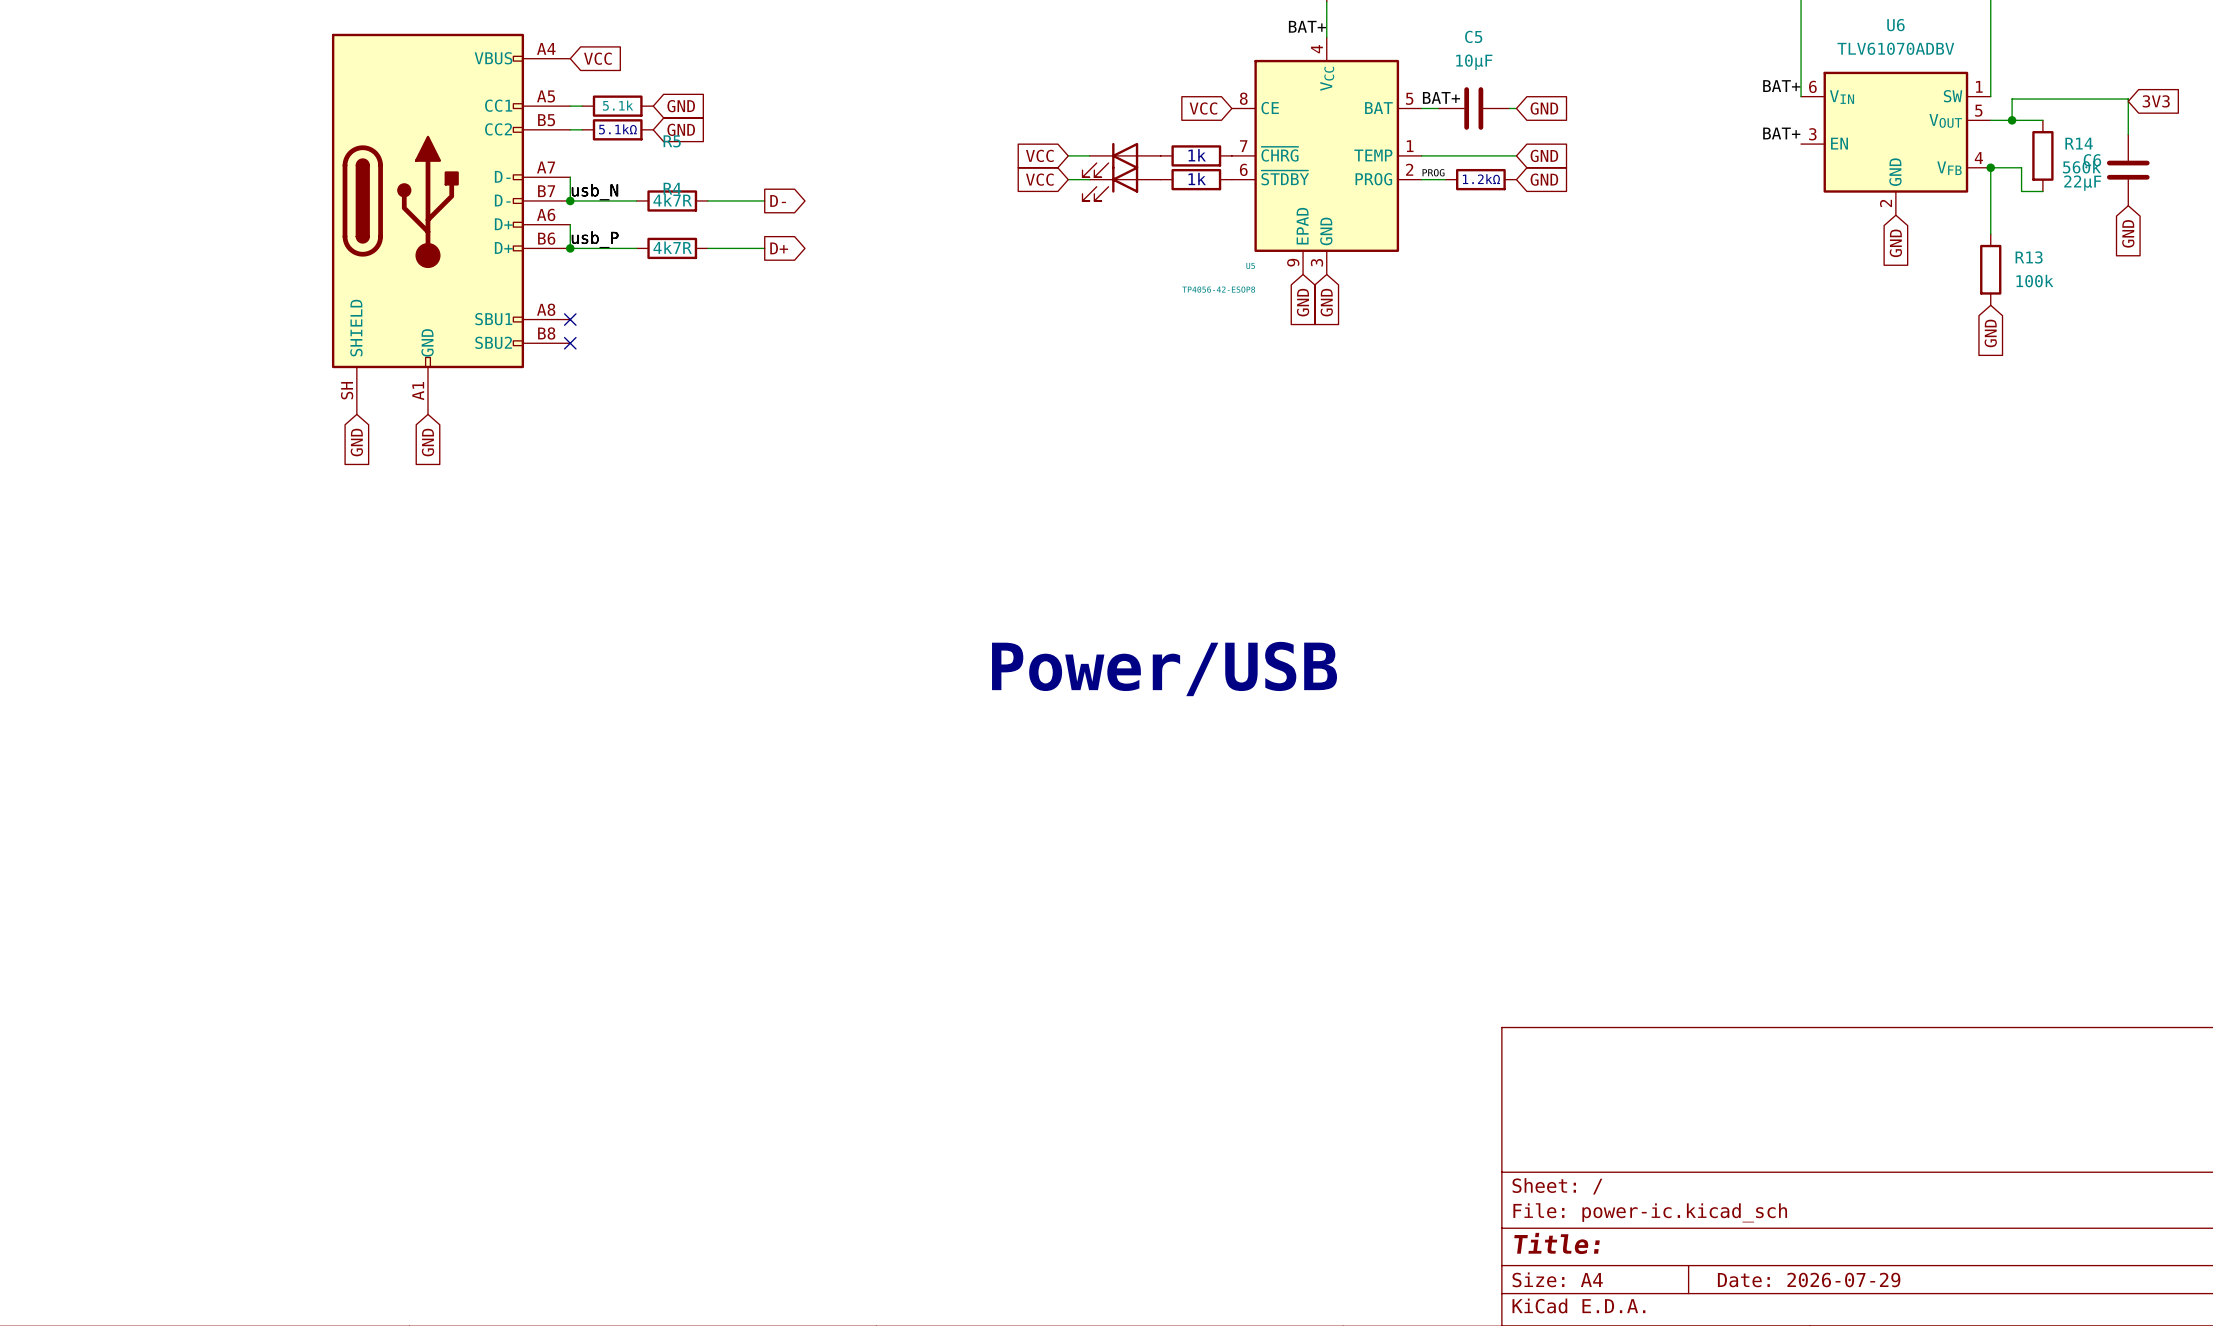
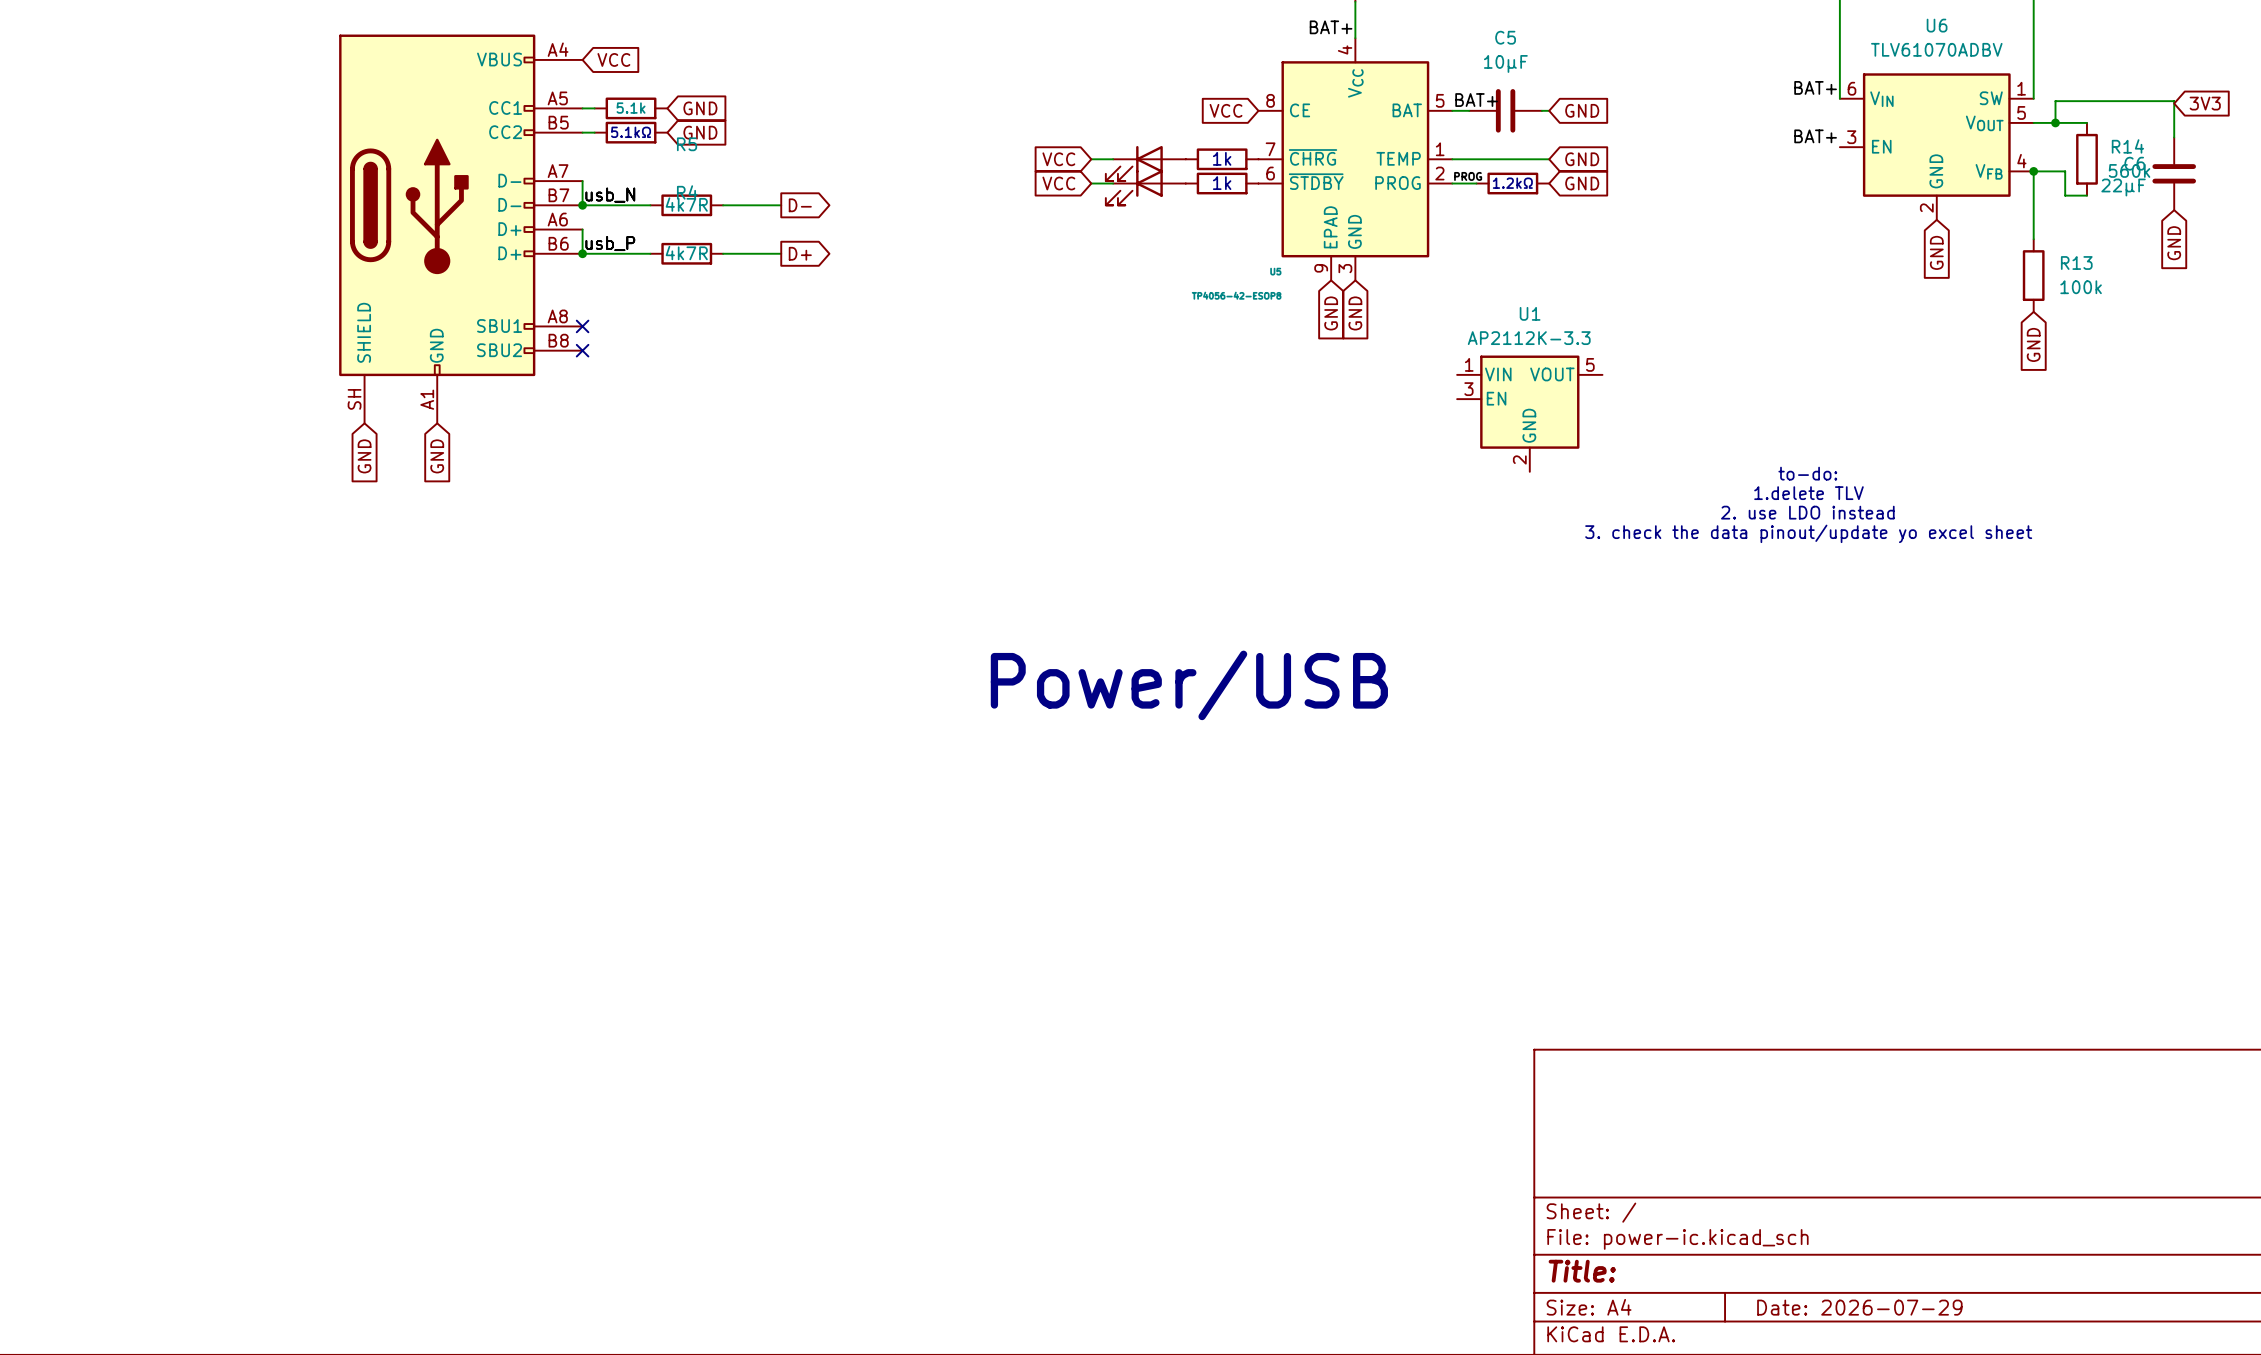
U1: none -> AP2112K-3.3 (1529, 413)
text: none -> to-do: (1807, 473)
text: none -> 1.delete TLV (1808, 493)
text: none -> 2. use LDO instead (1807, 512)
text: none -> 3. check the data pinout/update yo excel sheet (1808, 533)

